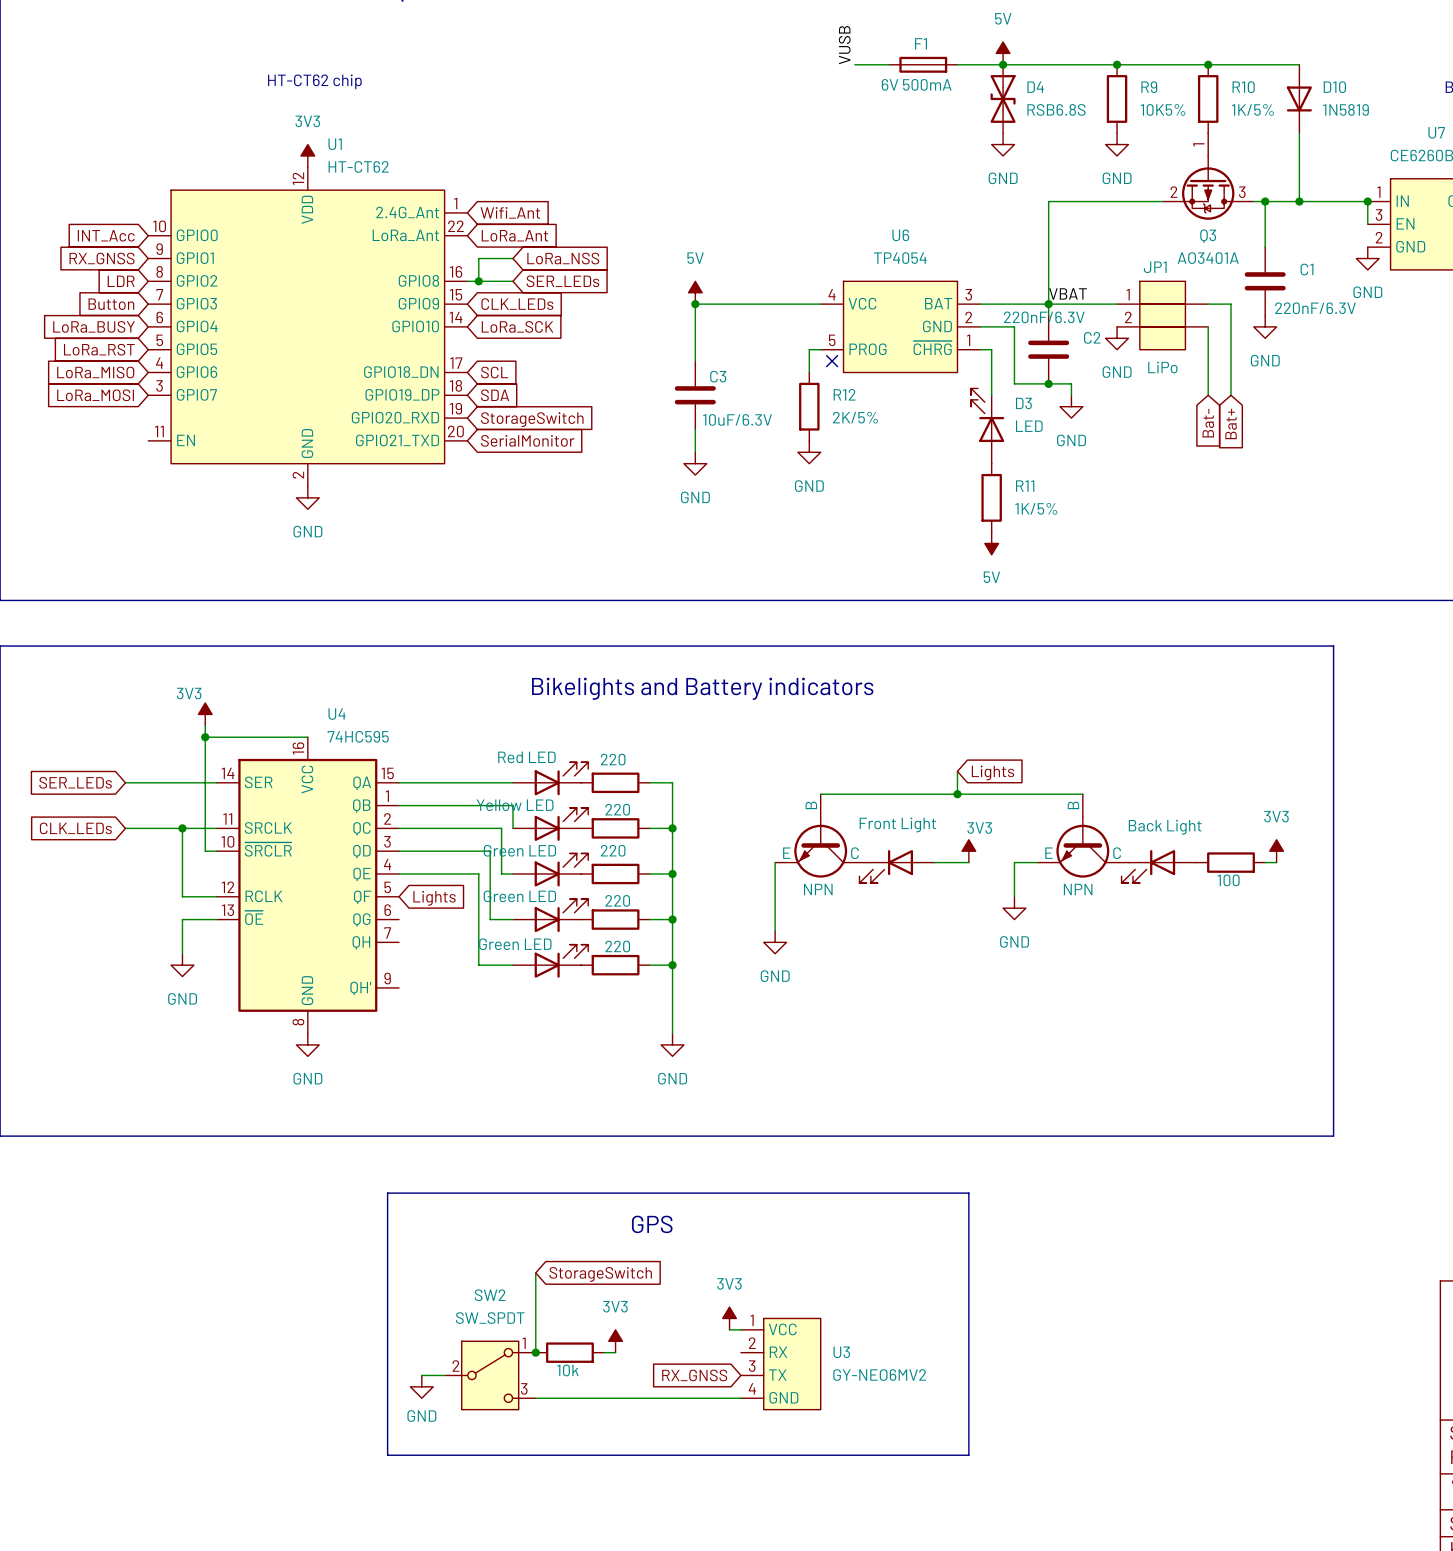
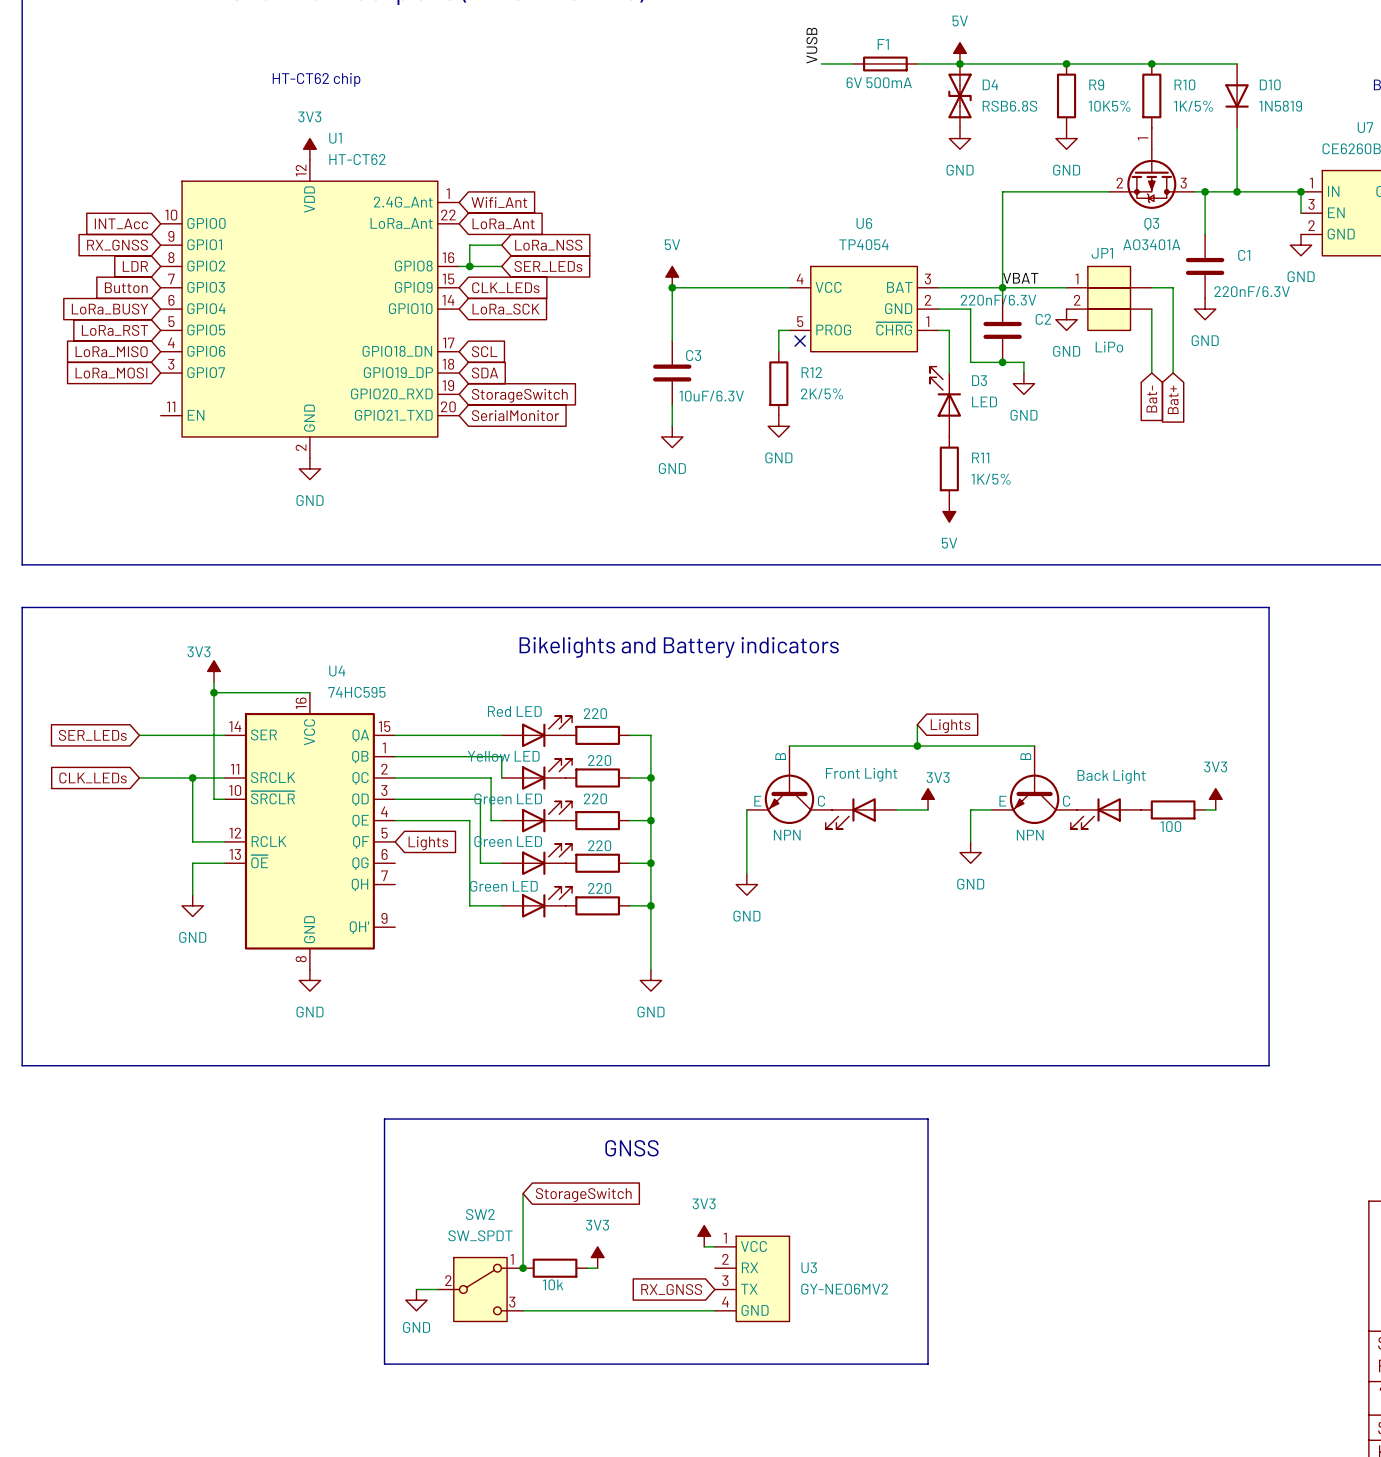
text: GPS (652, 1224) -> GNSS (631, 1148)

